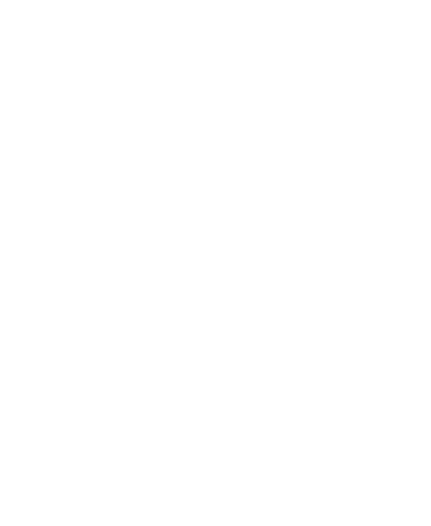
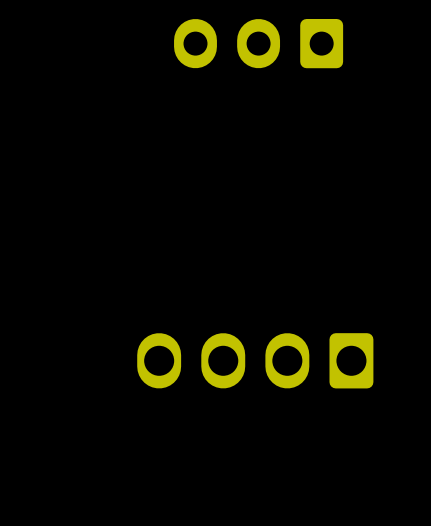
part: none -> (258, 43)
part: none -> (255, 360)

